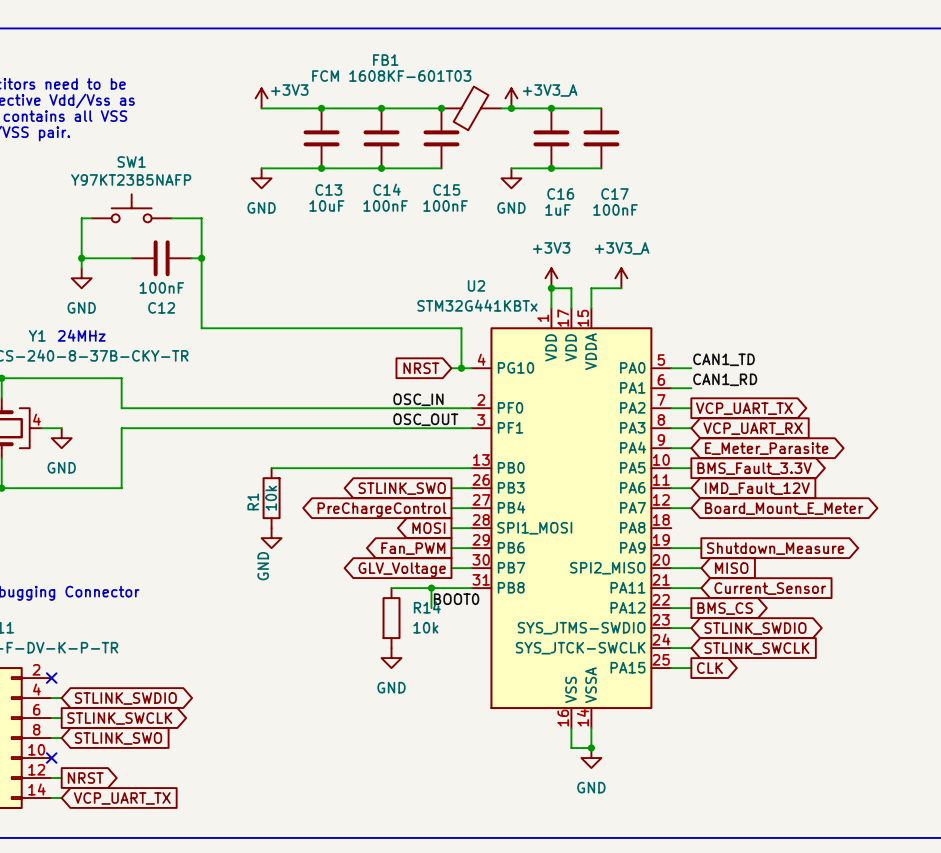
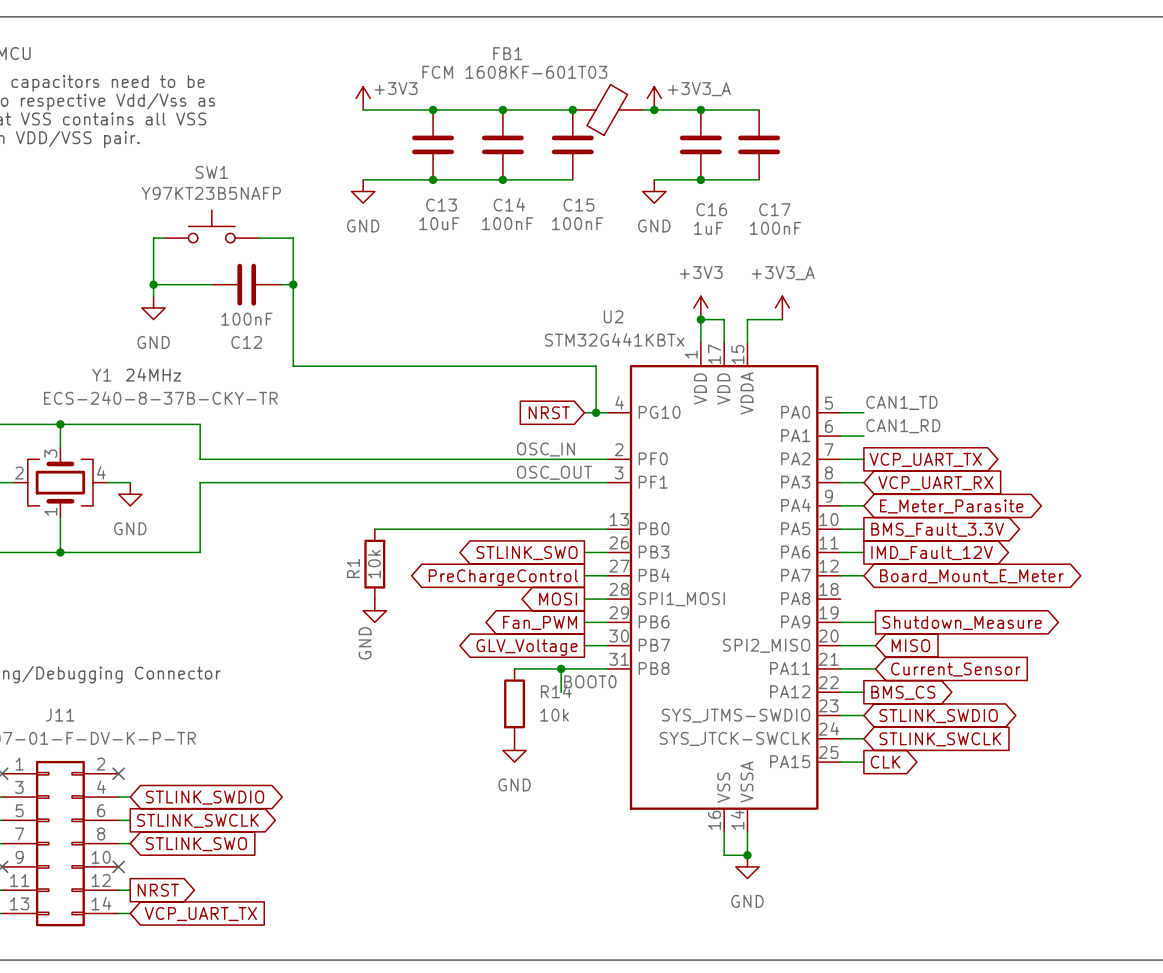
global label shape: input (757, 488) -> output (932, 553)

